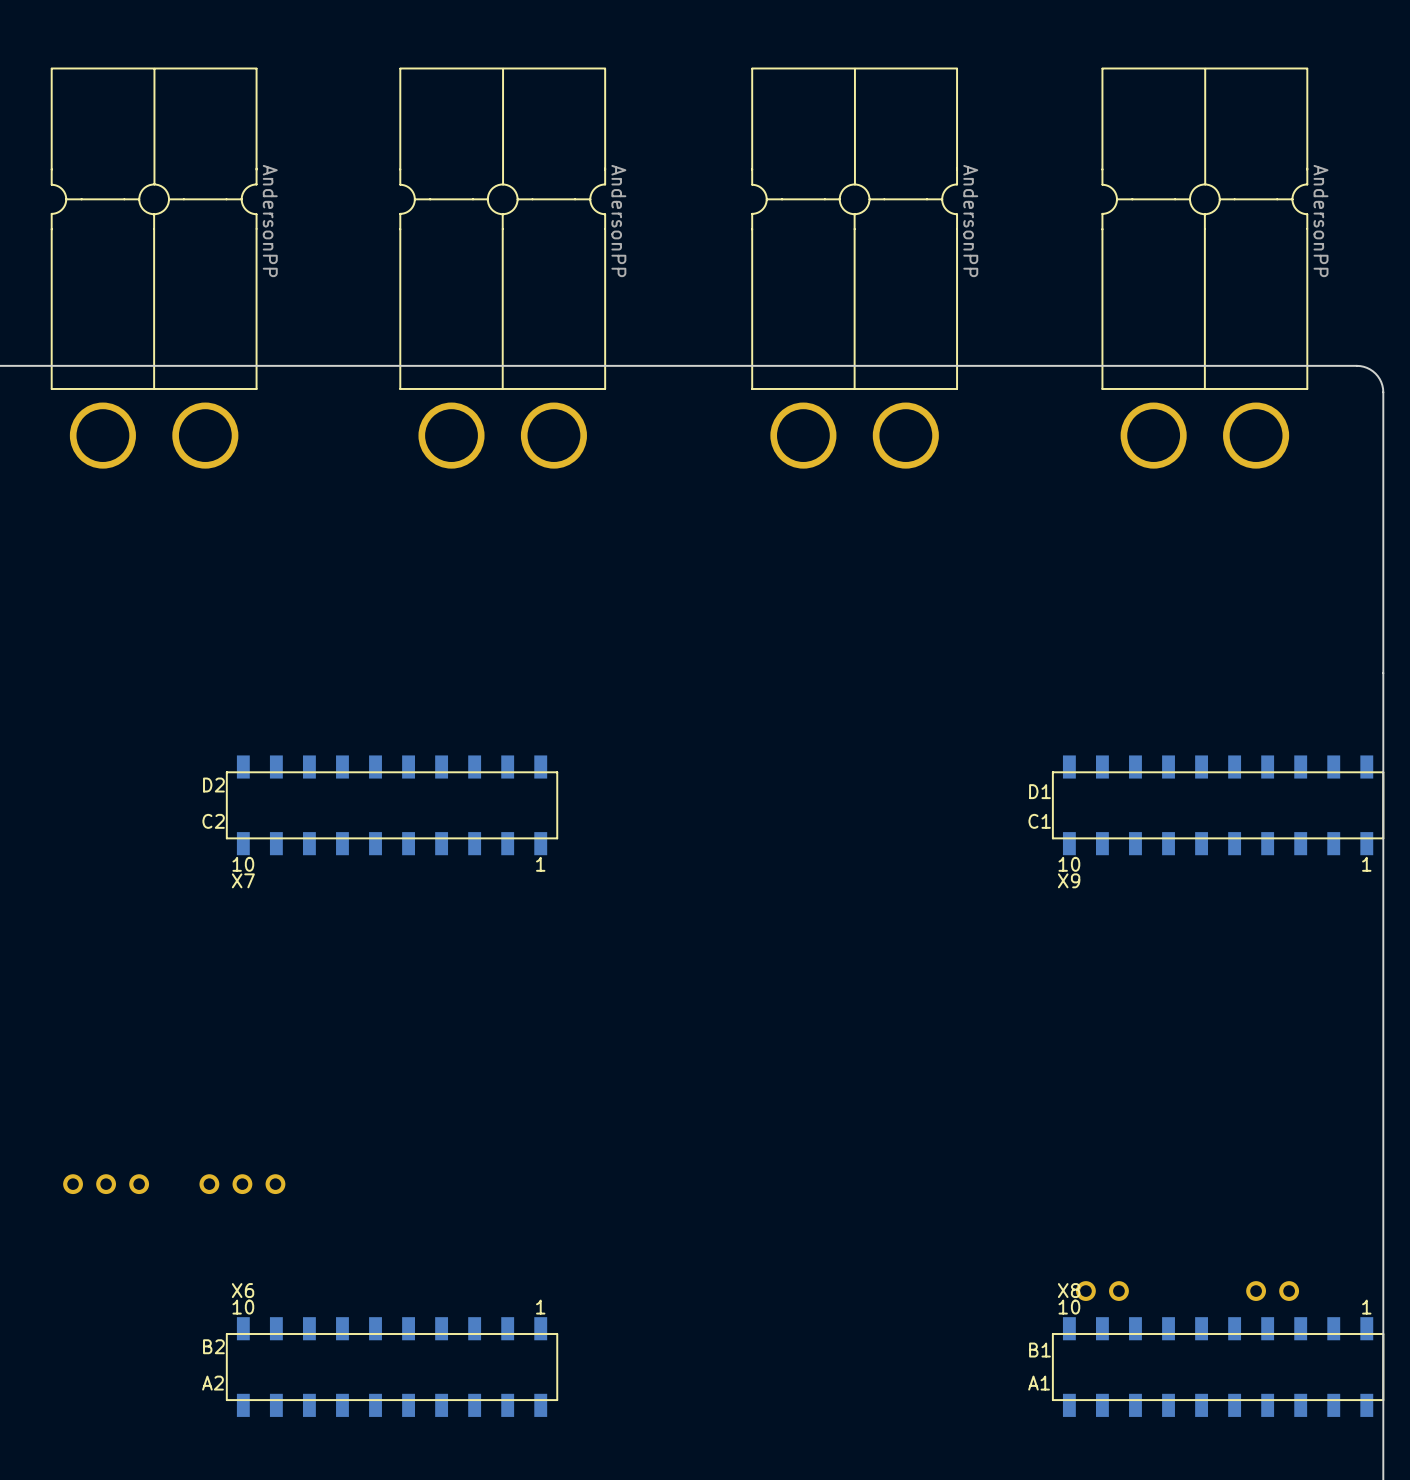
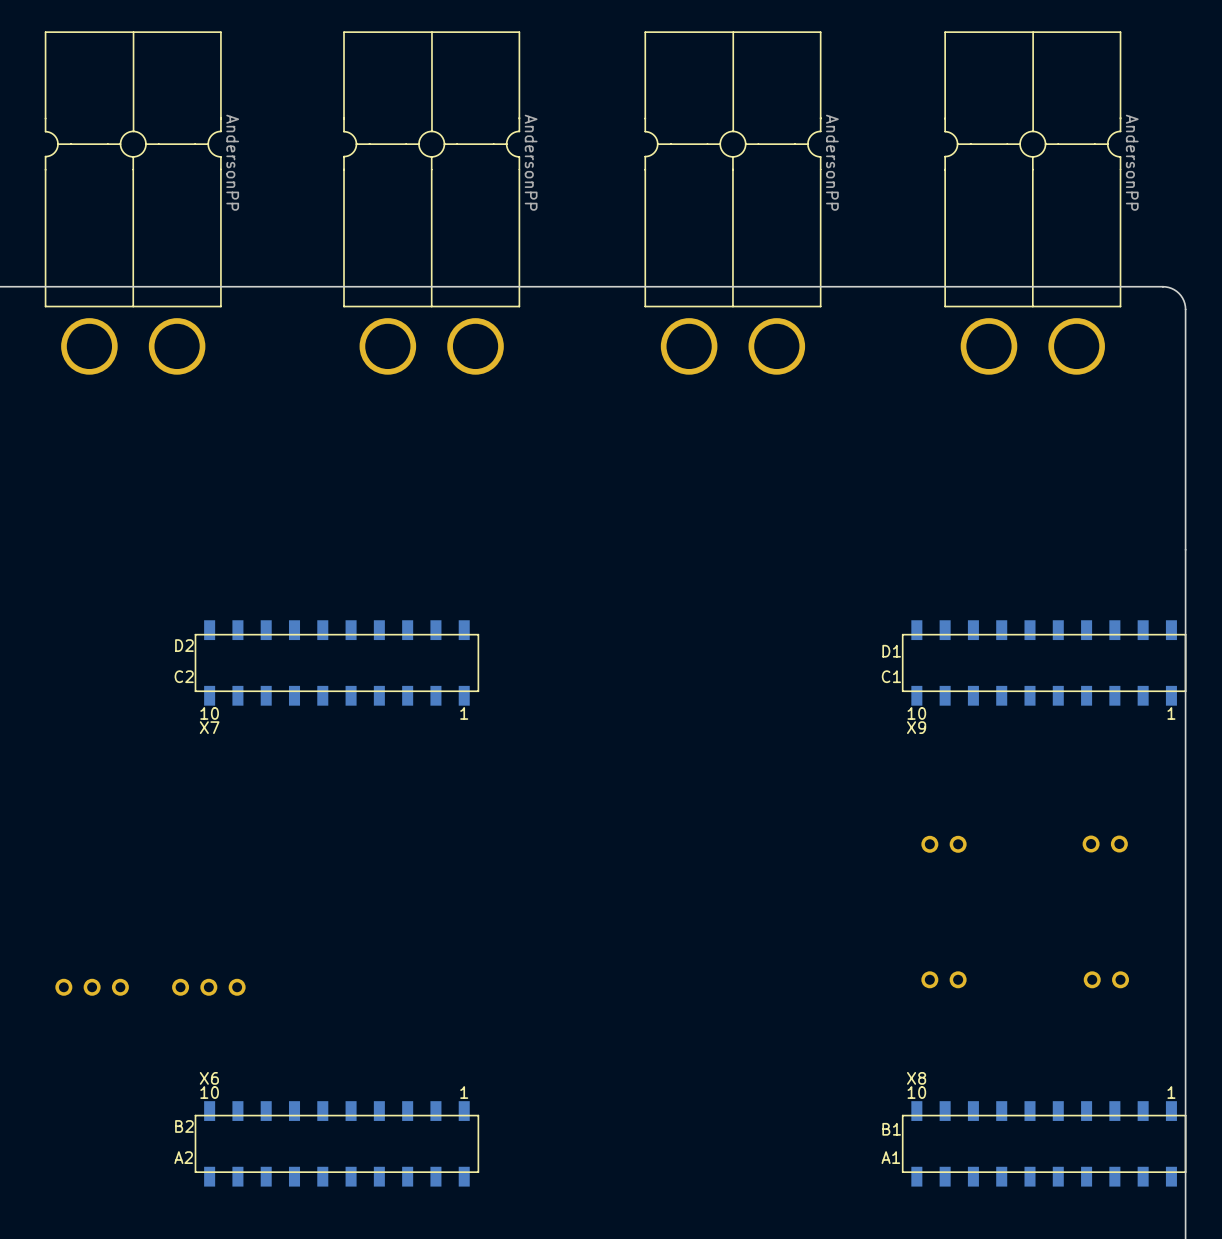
part: none -> (1105, 844)
part: none -> (944, 844)
part: none -> (943, 979)
part: none -> (1106, 979)
part: (1102, 1291) -> none
part: (1272, 1291) -> none

